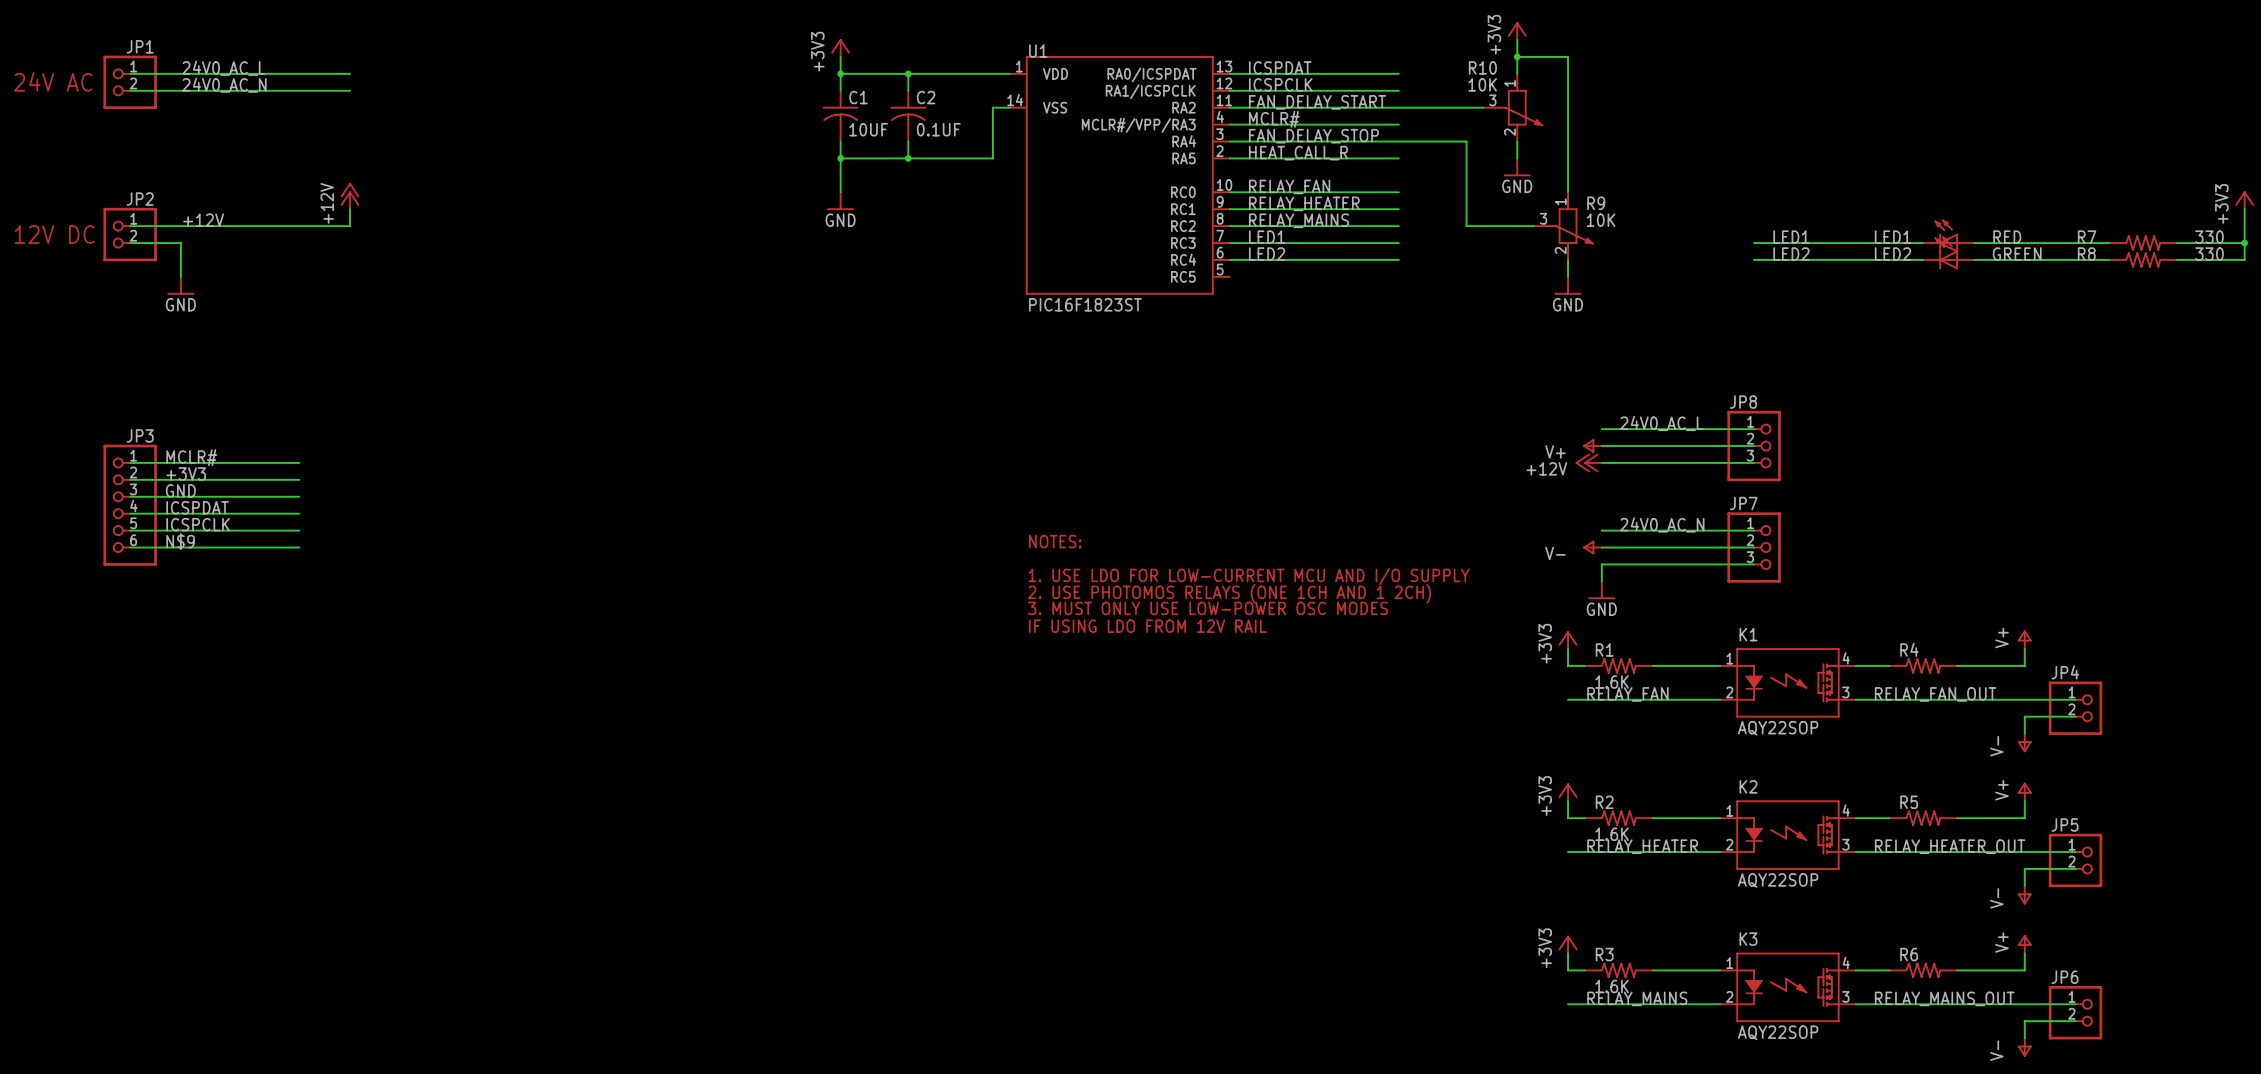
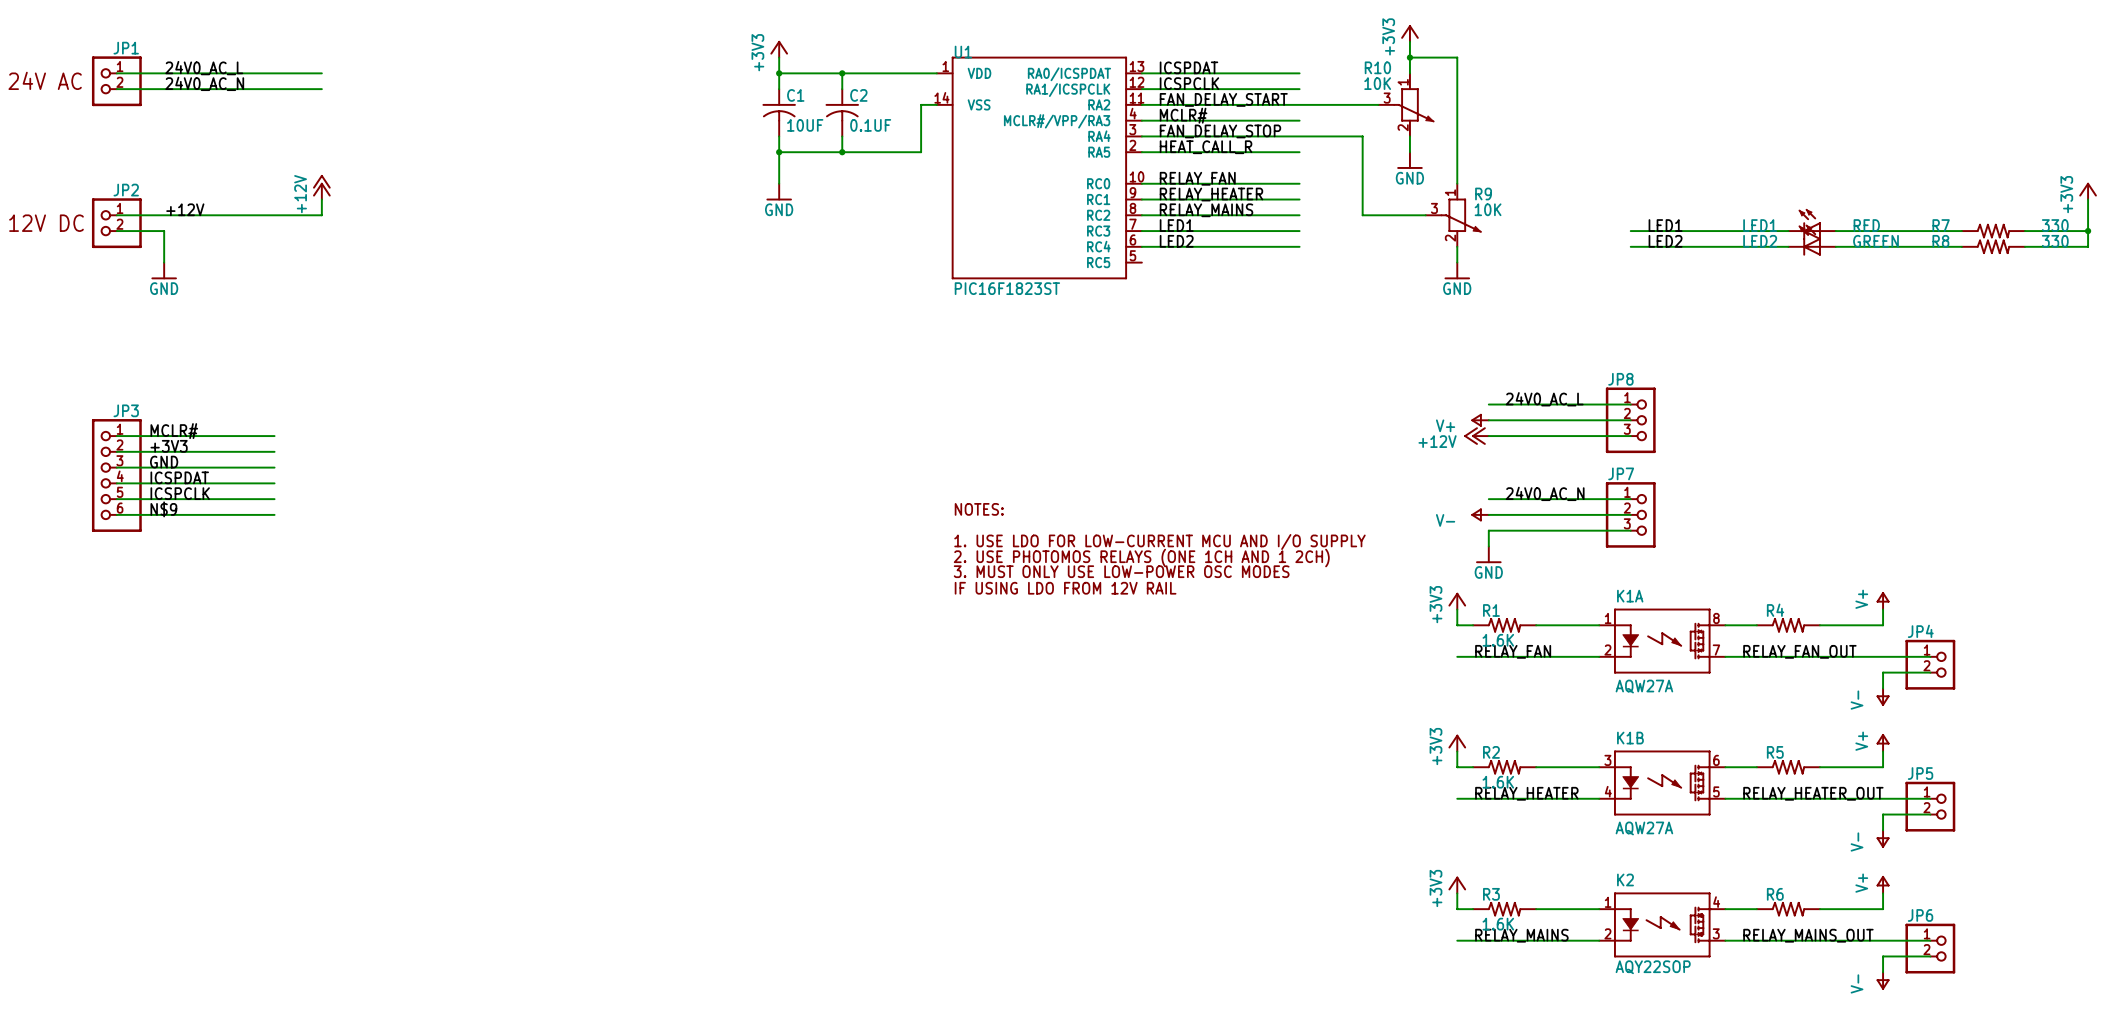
K1: AQY22SOP (1787, 682) -> none
K1A: none -> AQW27A (1662, 641)
K2: AQY22SOP (1787, 835) -> none
K1B: none -> AQW27A (1662, 783)
K3 name: K3 (1748, 939) -> K2 (1625, 879)

